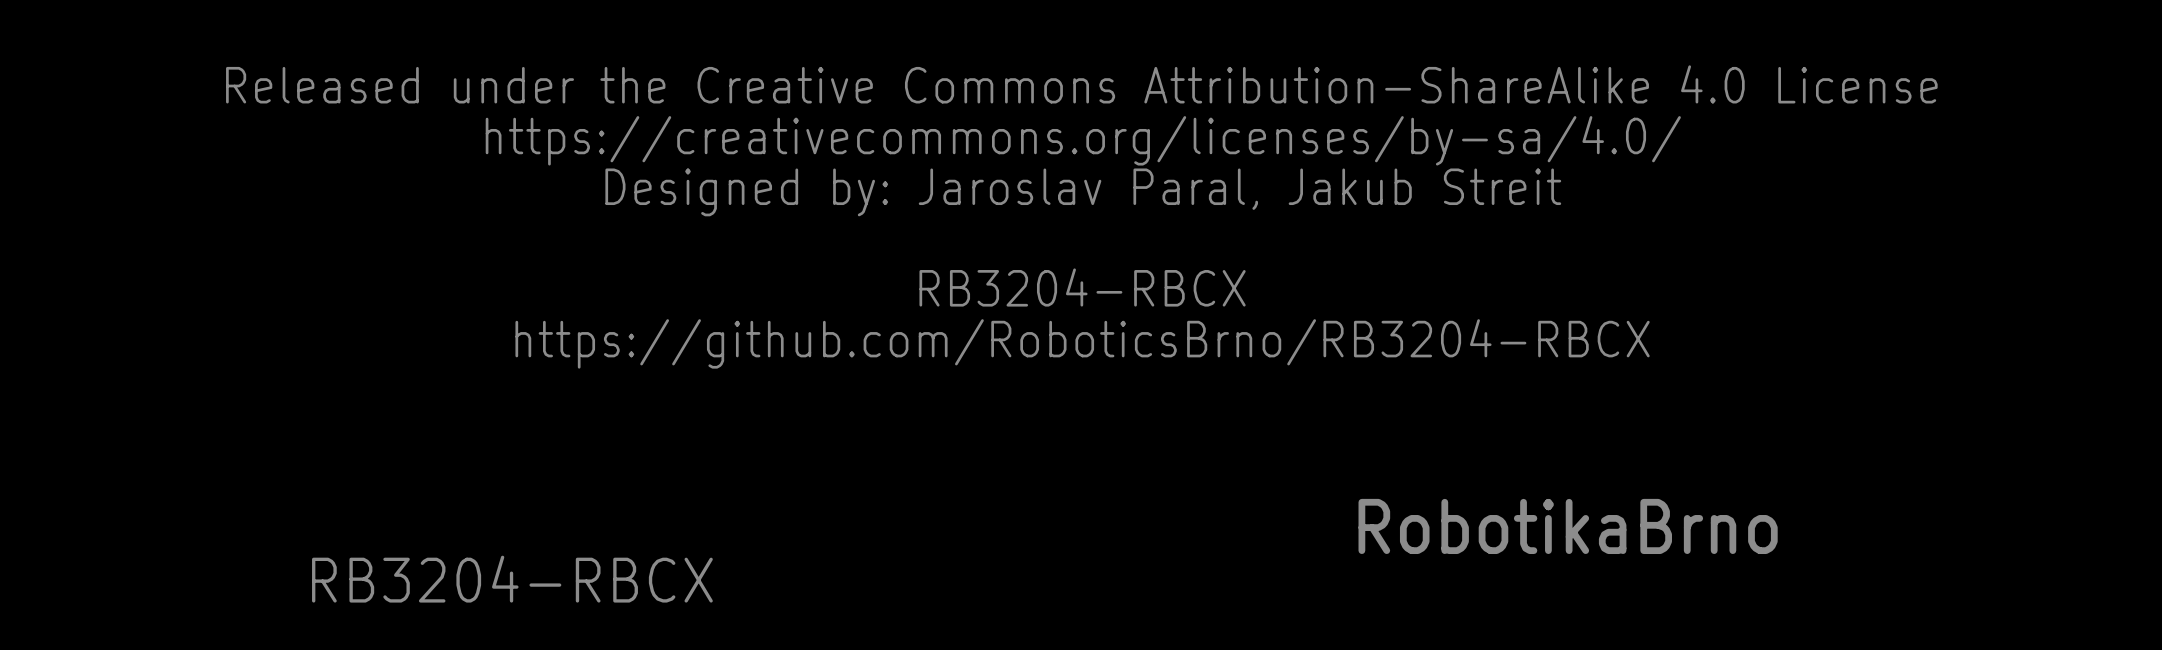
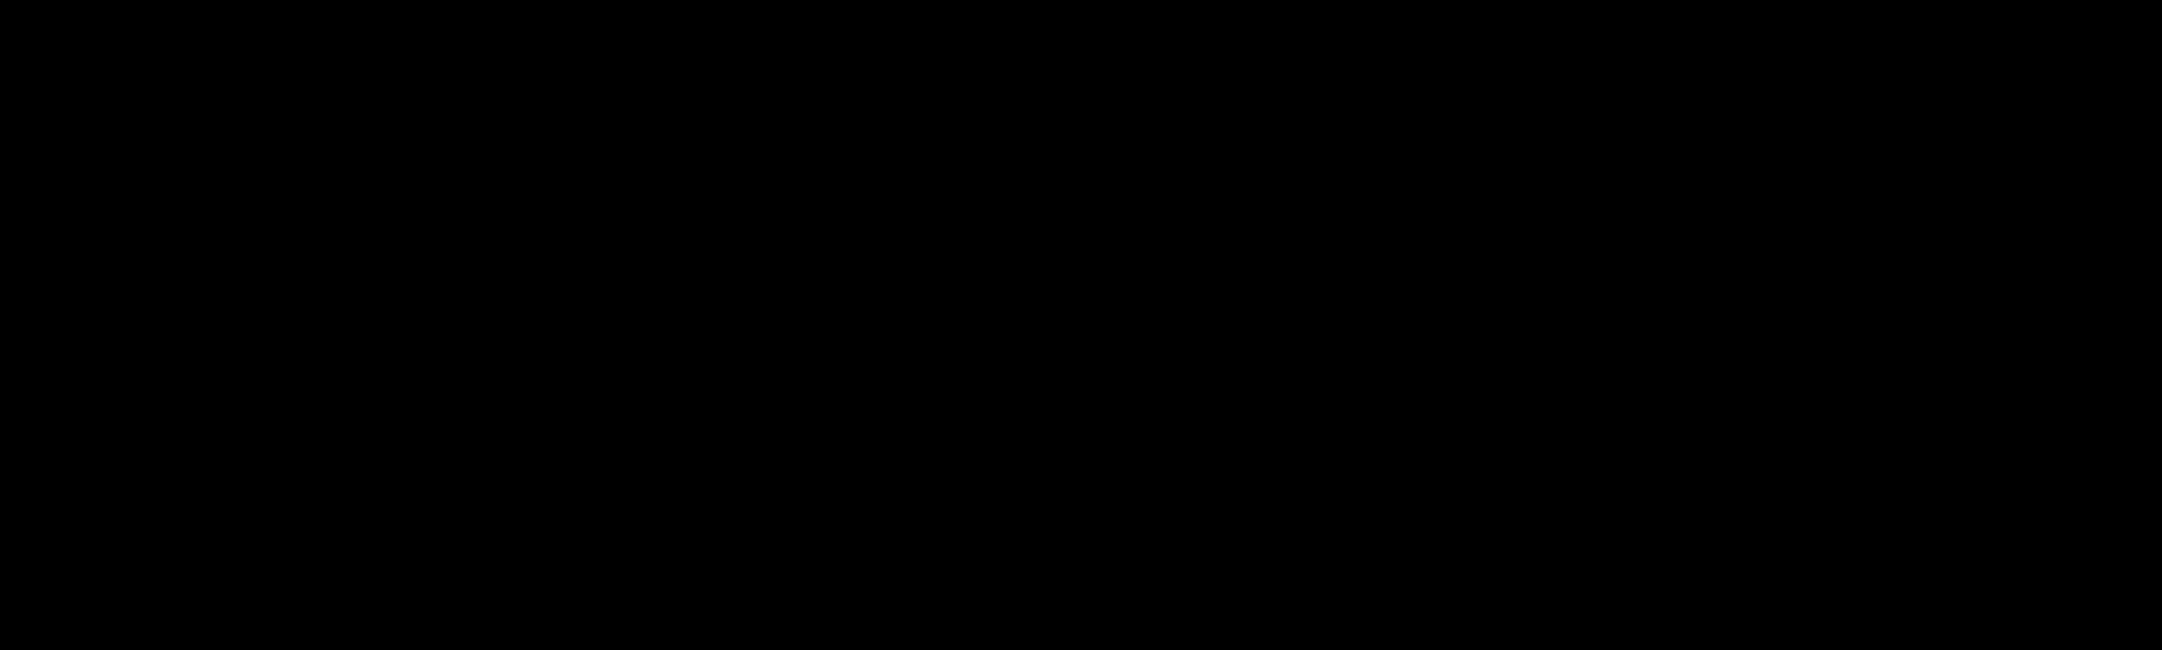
text: Released under the Creative Commons Attribution-ShareAlike 4.0 License (1081, 84) -> none
text: https://creativecommons.org/licenses/by-sa/4.0/ (1083, 140) -> none
text: Designed by: Jaroslav Paral, Jakub Streit (1083, 192) -> none
text: RB3204-RBCX (1082, 287) -> none
text: https://github.com/RoboticsBrno/RB3204-RBCX (1082, 343) -> none
text: RobotikaBrno (1568, 526) -> none
text: RB3204-RBCX (512, 579) -> none

